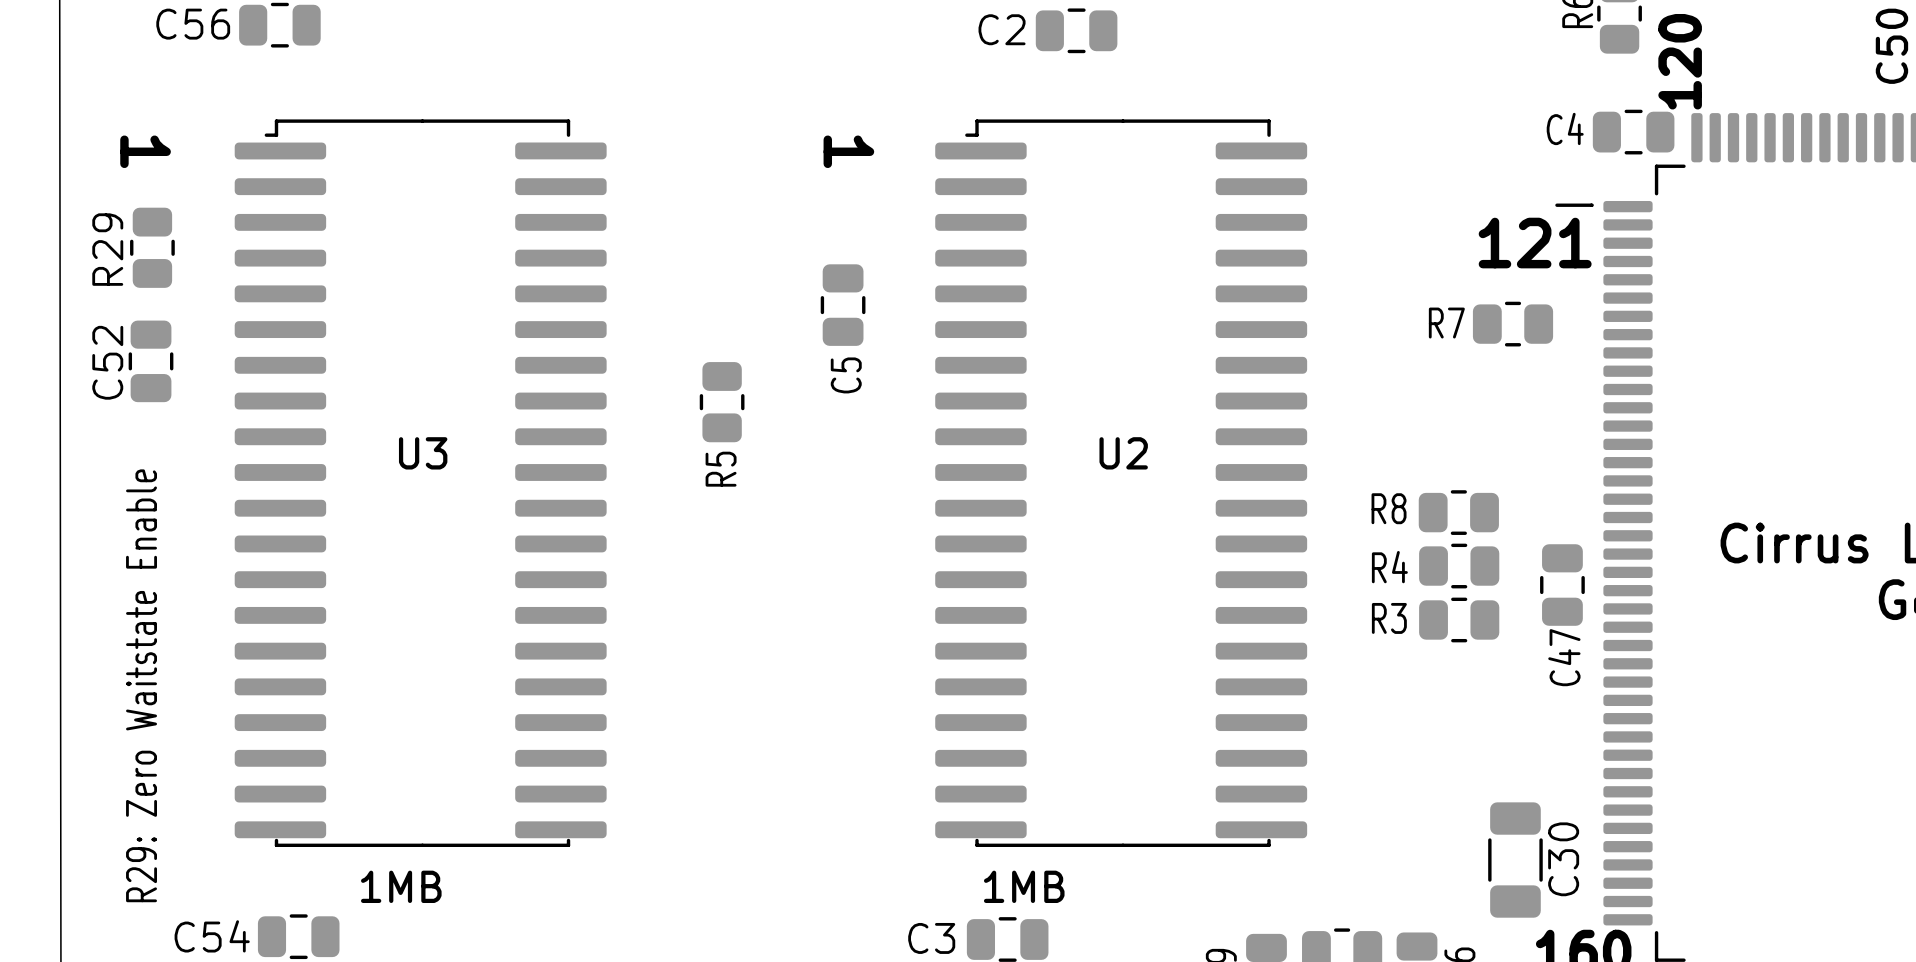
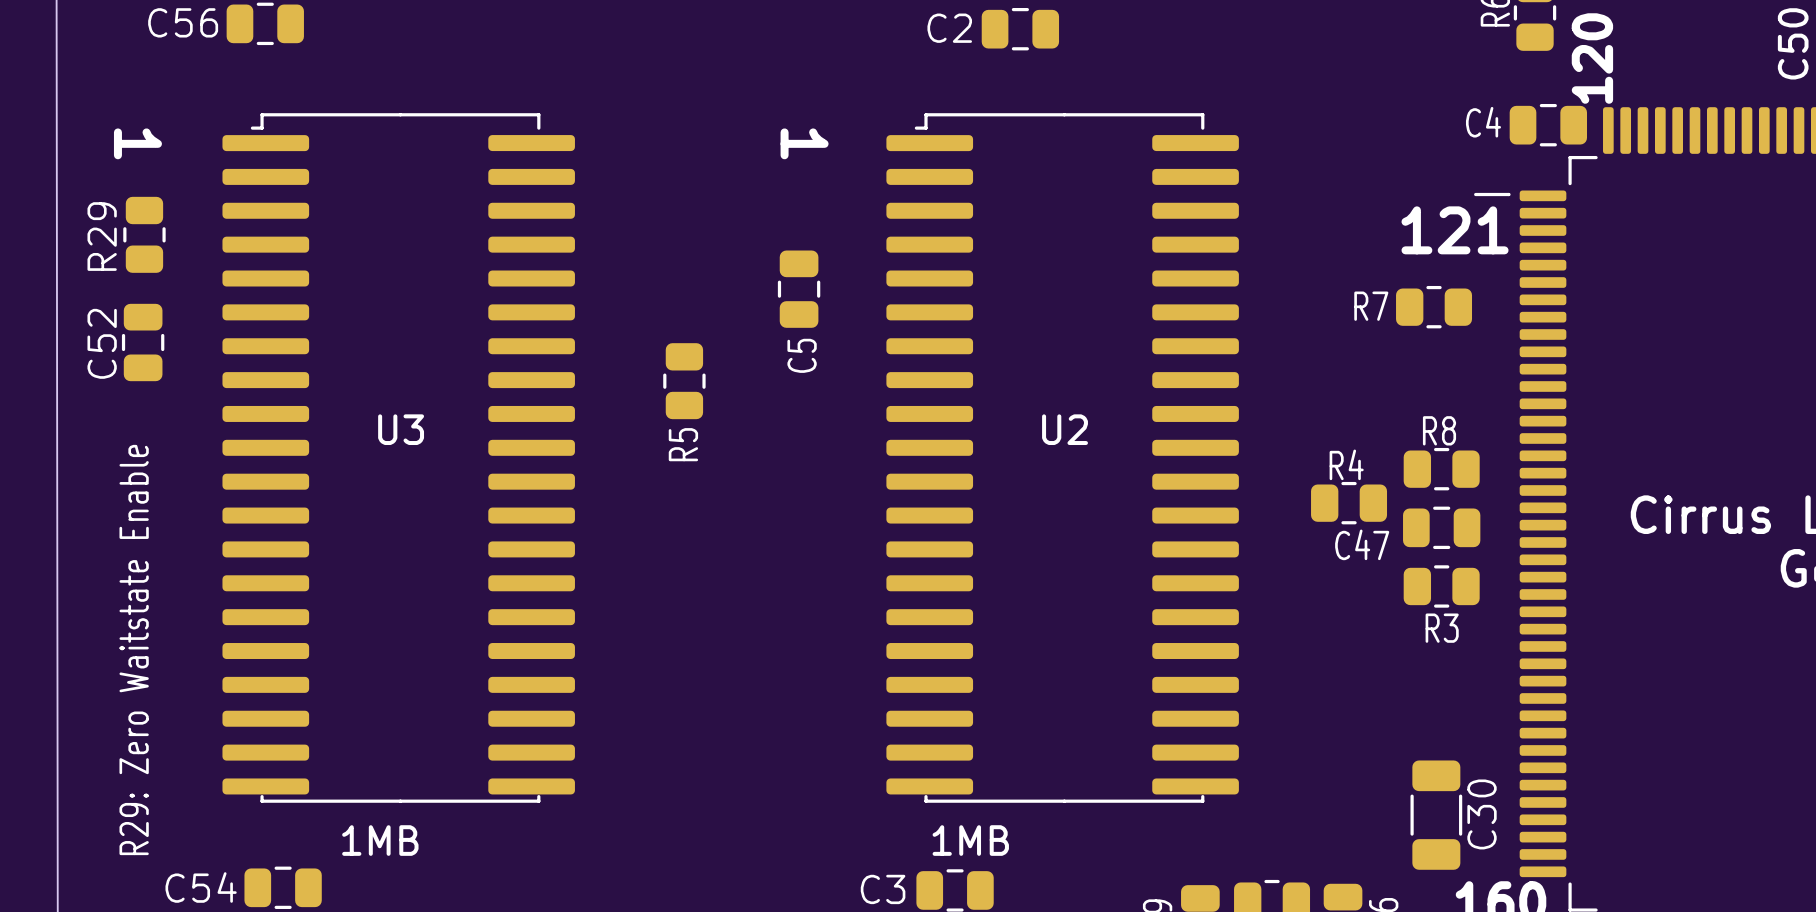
R8 name position: R8 (1389, 508) -> R8 (1439, 430)
R8 position: (1458, 512) -> (1441, 469)
R4 position: (1459, 566) -> (1349, 503)
R4 name position: R4 (1389, 567) -> R4 (1346, 464)
C47 rotation: 0° (1562, 585) -> 90° clockwise (1441, 527)
C47 position: (1562, 585) -> (1441, 527)
R3 name position: R3 (1389, 618) -> R3 (1442, 628)
R3 position: (1459, 619) -> (1441, 586)

